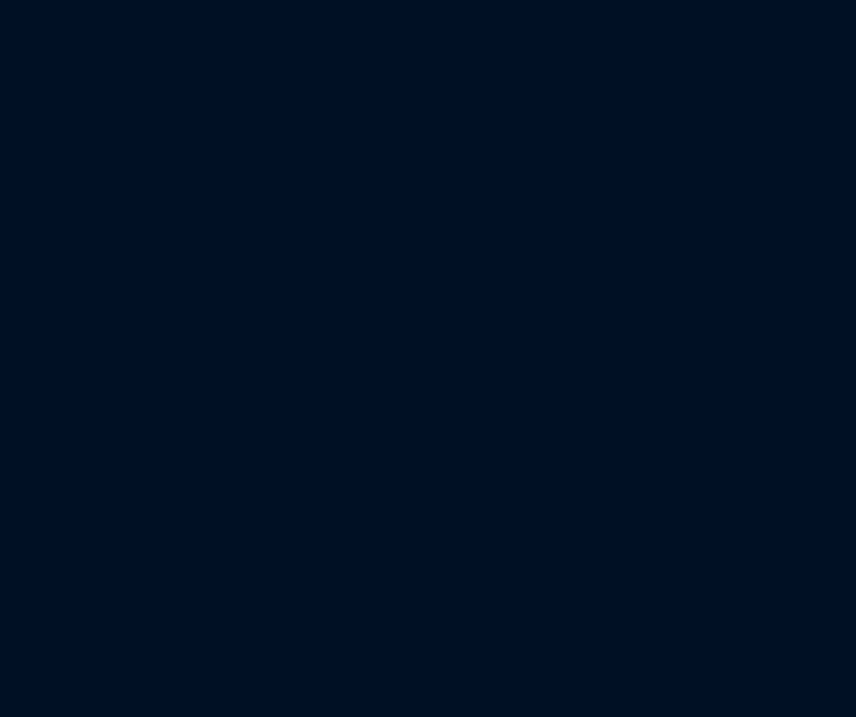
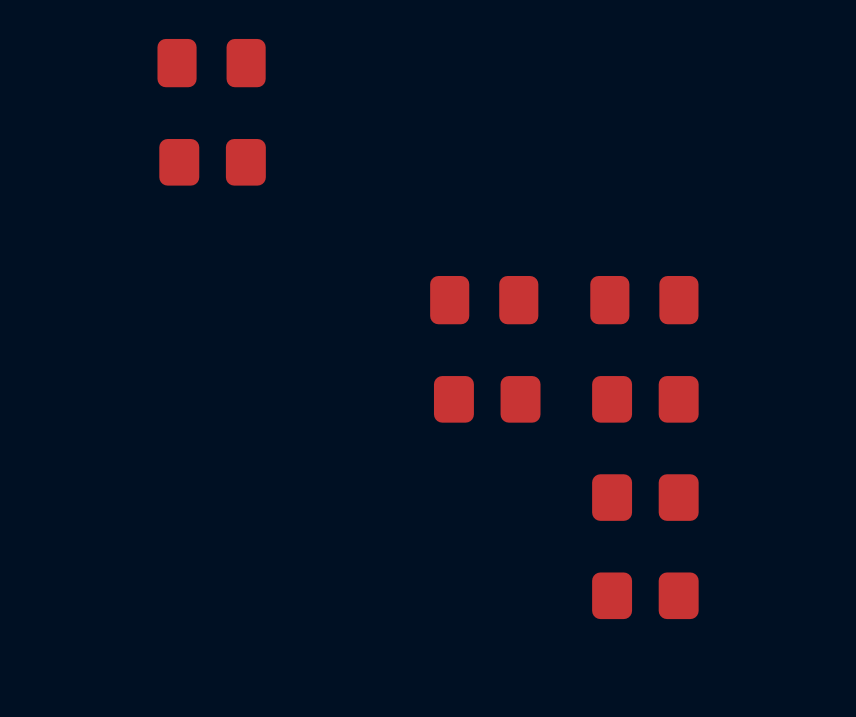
part: none -> (211, 63)
part: none -> (212, 162)
part: none -> (484, 300)
part: none -> (644, 300)
part: none -> (487, 399)
part: none -> (645, 399)
part: none -> (645, 497)
part: none -> (645, 595)

